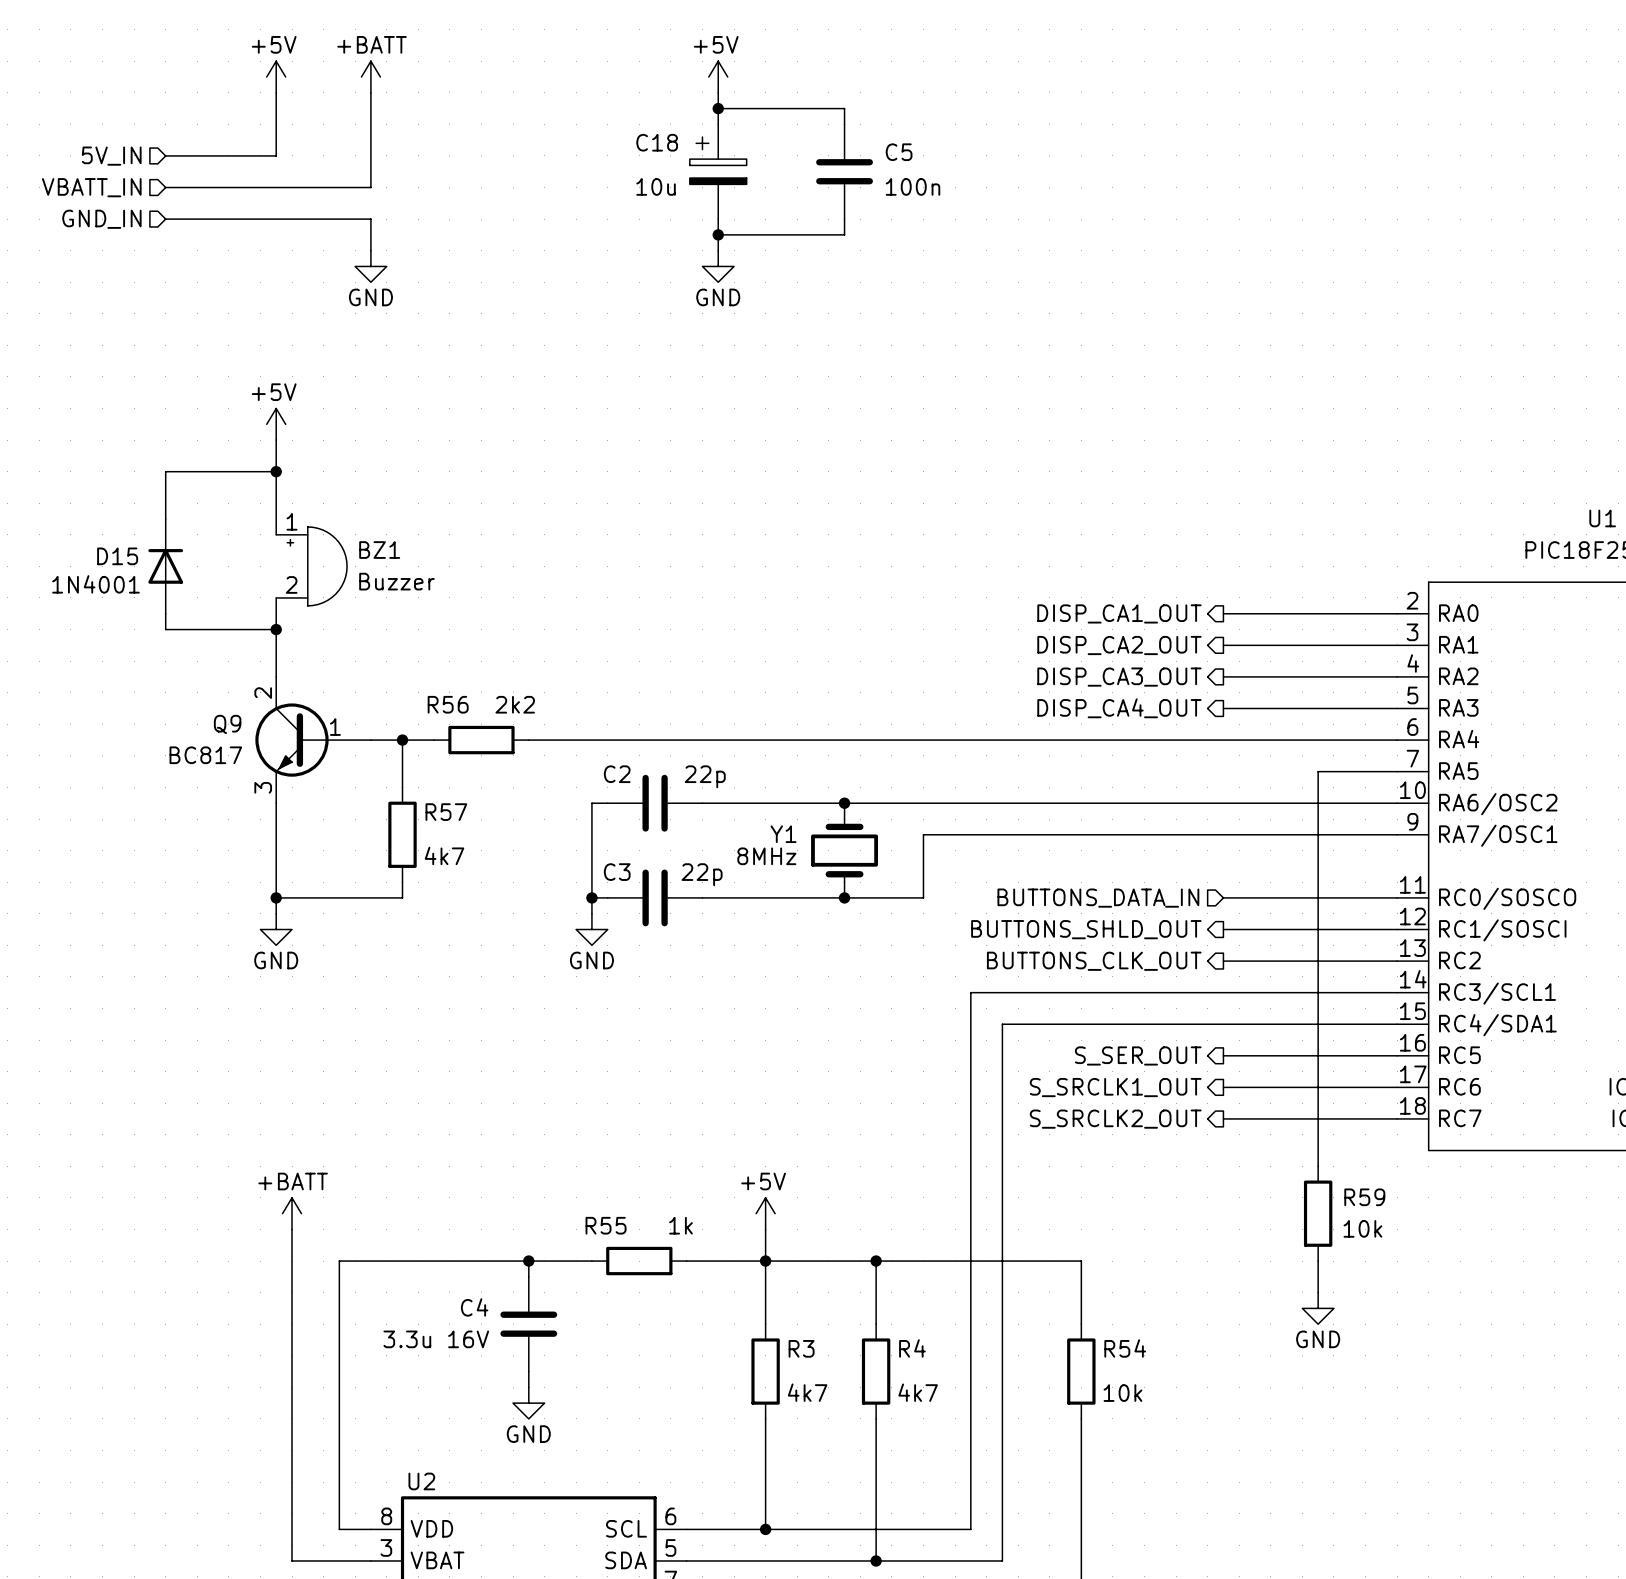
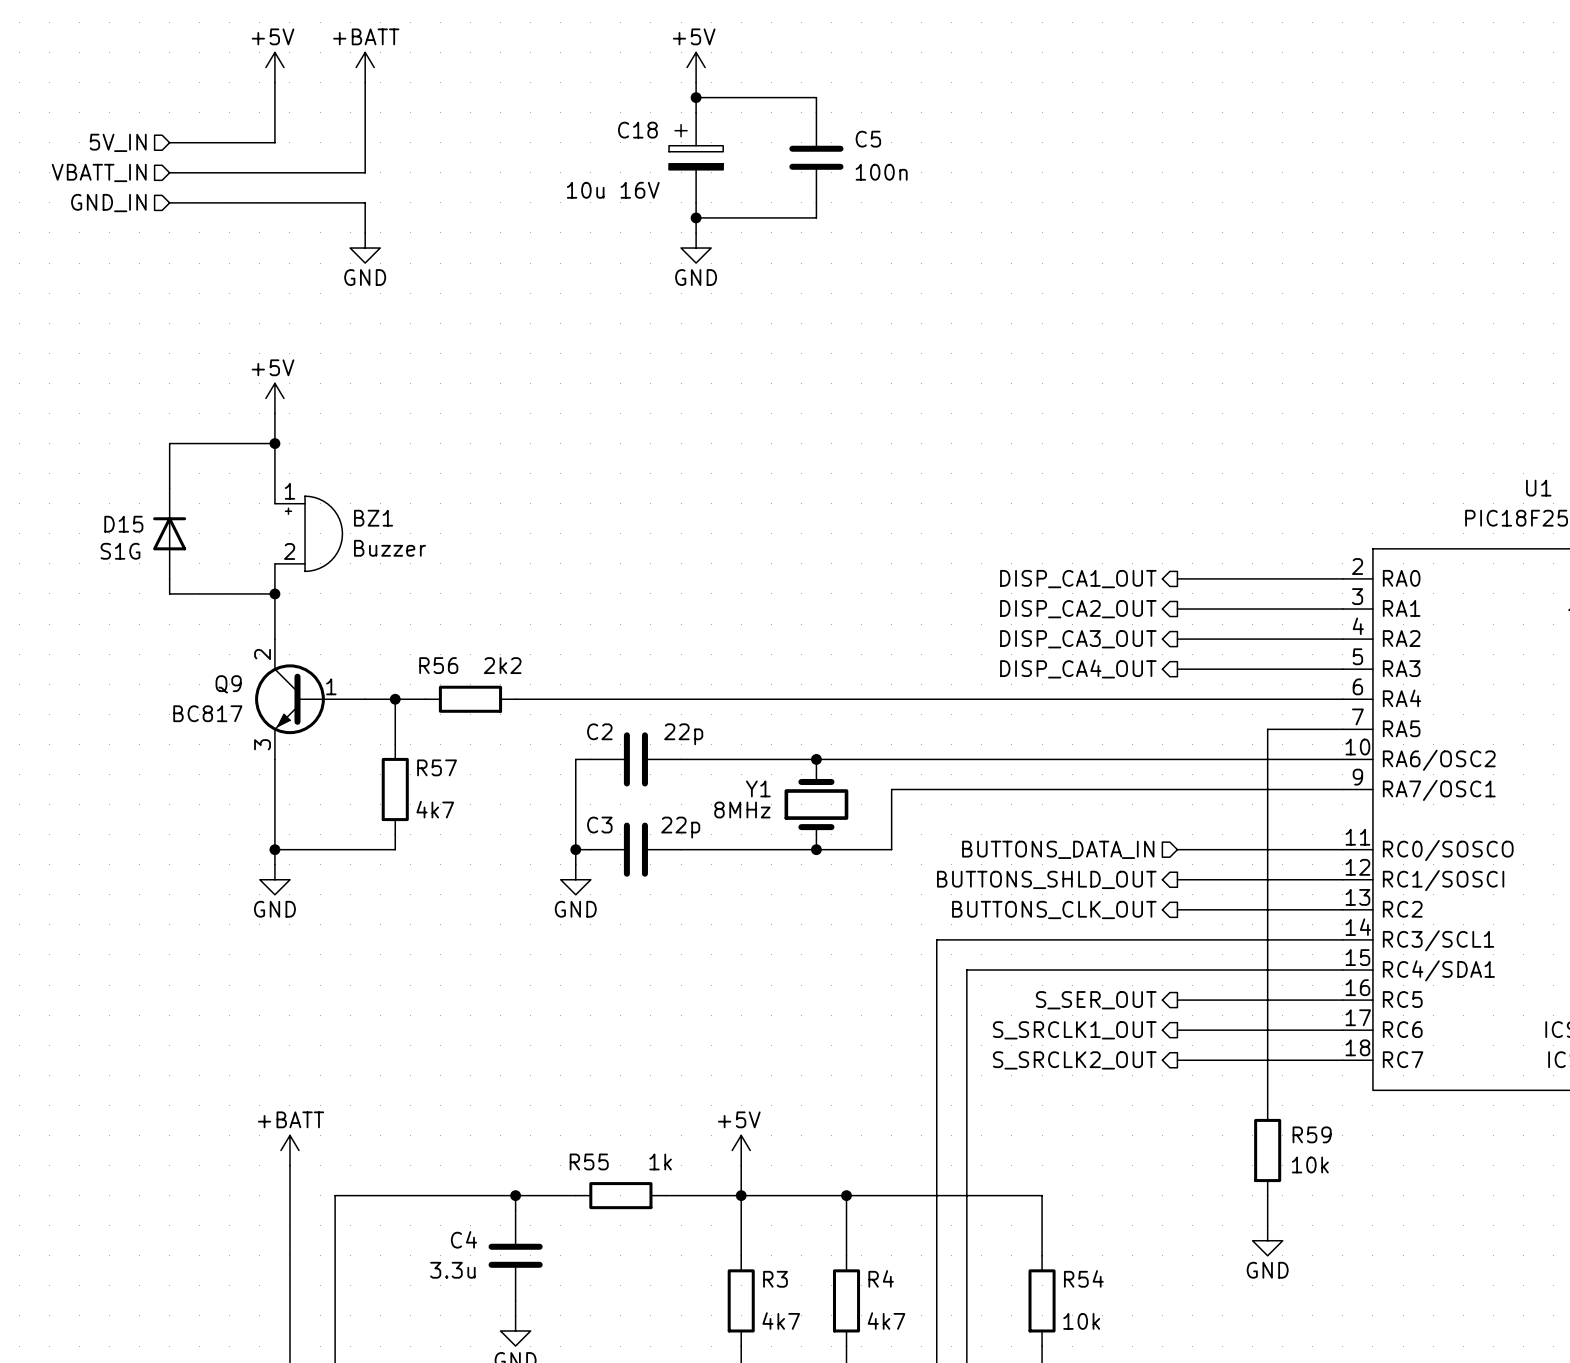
C18 value: 10u (656, 186) -> 10u 16V (613, 190)
D15 value: 1N4001 (95, 584) -> S1G (120, 551)
C4 value: 3.3u 16V (436, 1339) -> 3.3u (452, 1270)

